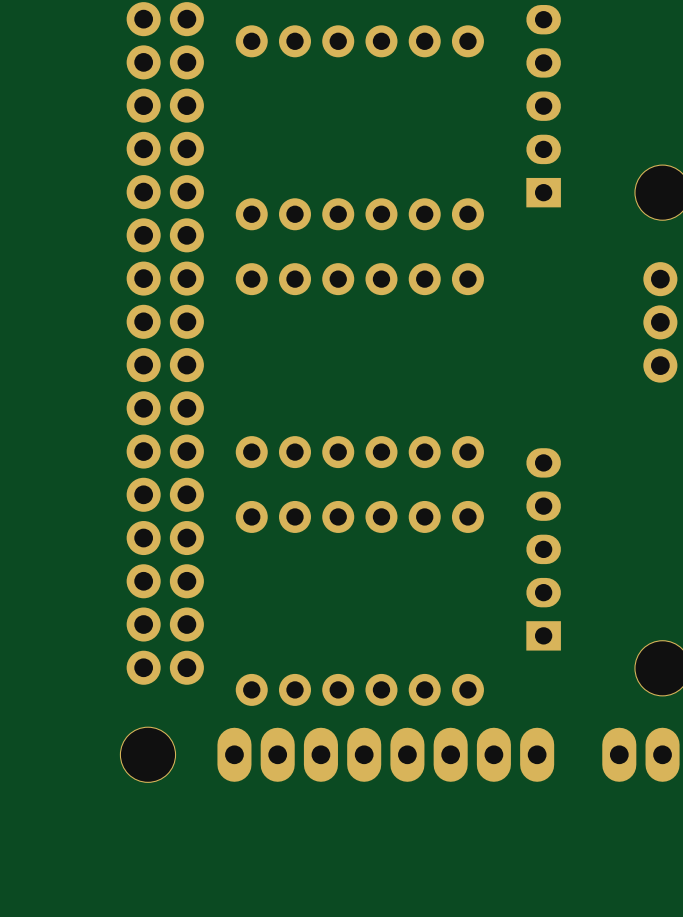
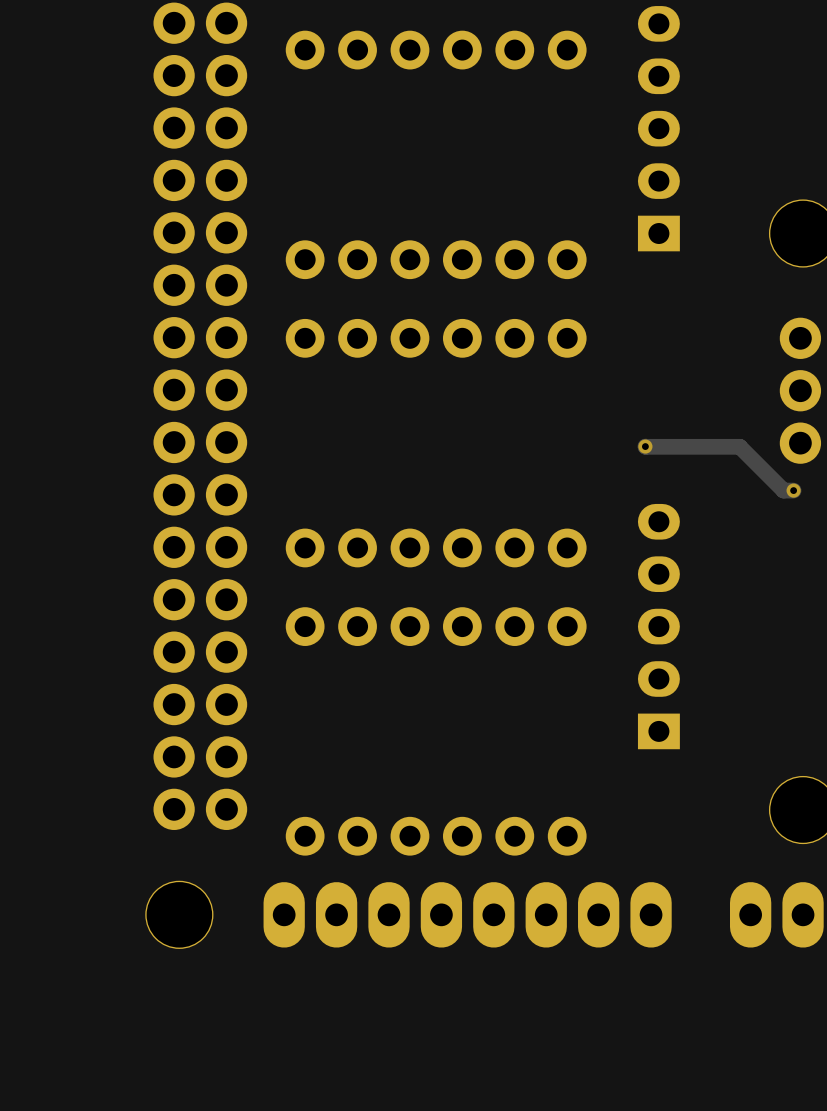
track: none -> (645, 446) (739, 446) (783, 490) (793, 490)
via: none -> (645, 446)
via: none -> (793, 490)
part position: (543, 549) -> (658, 626)

